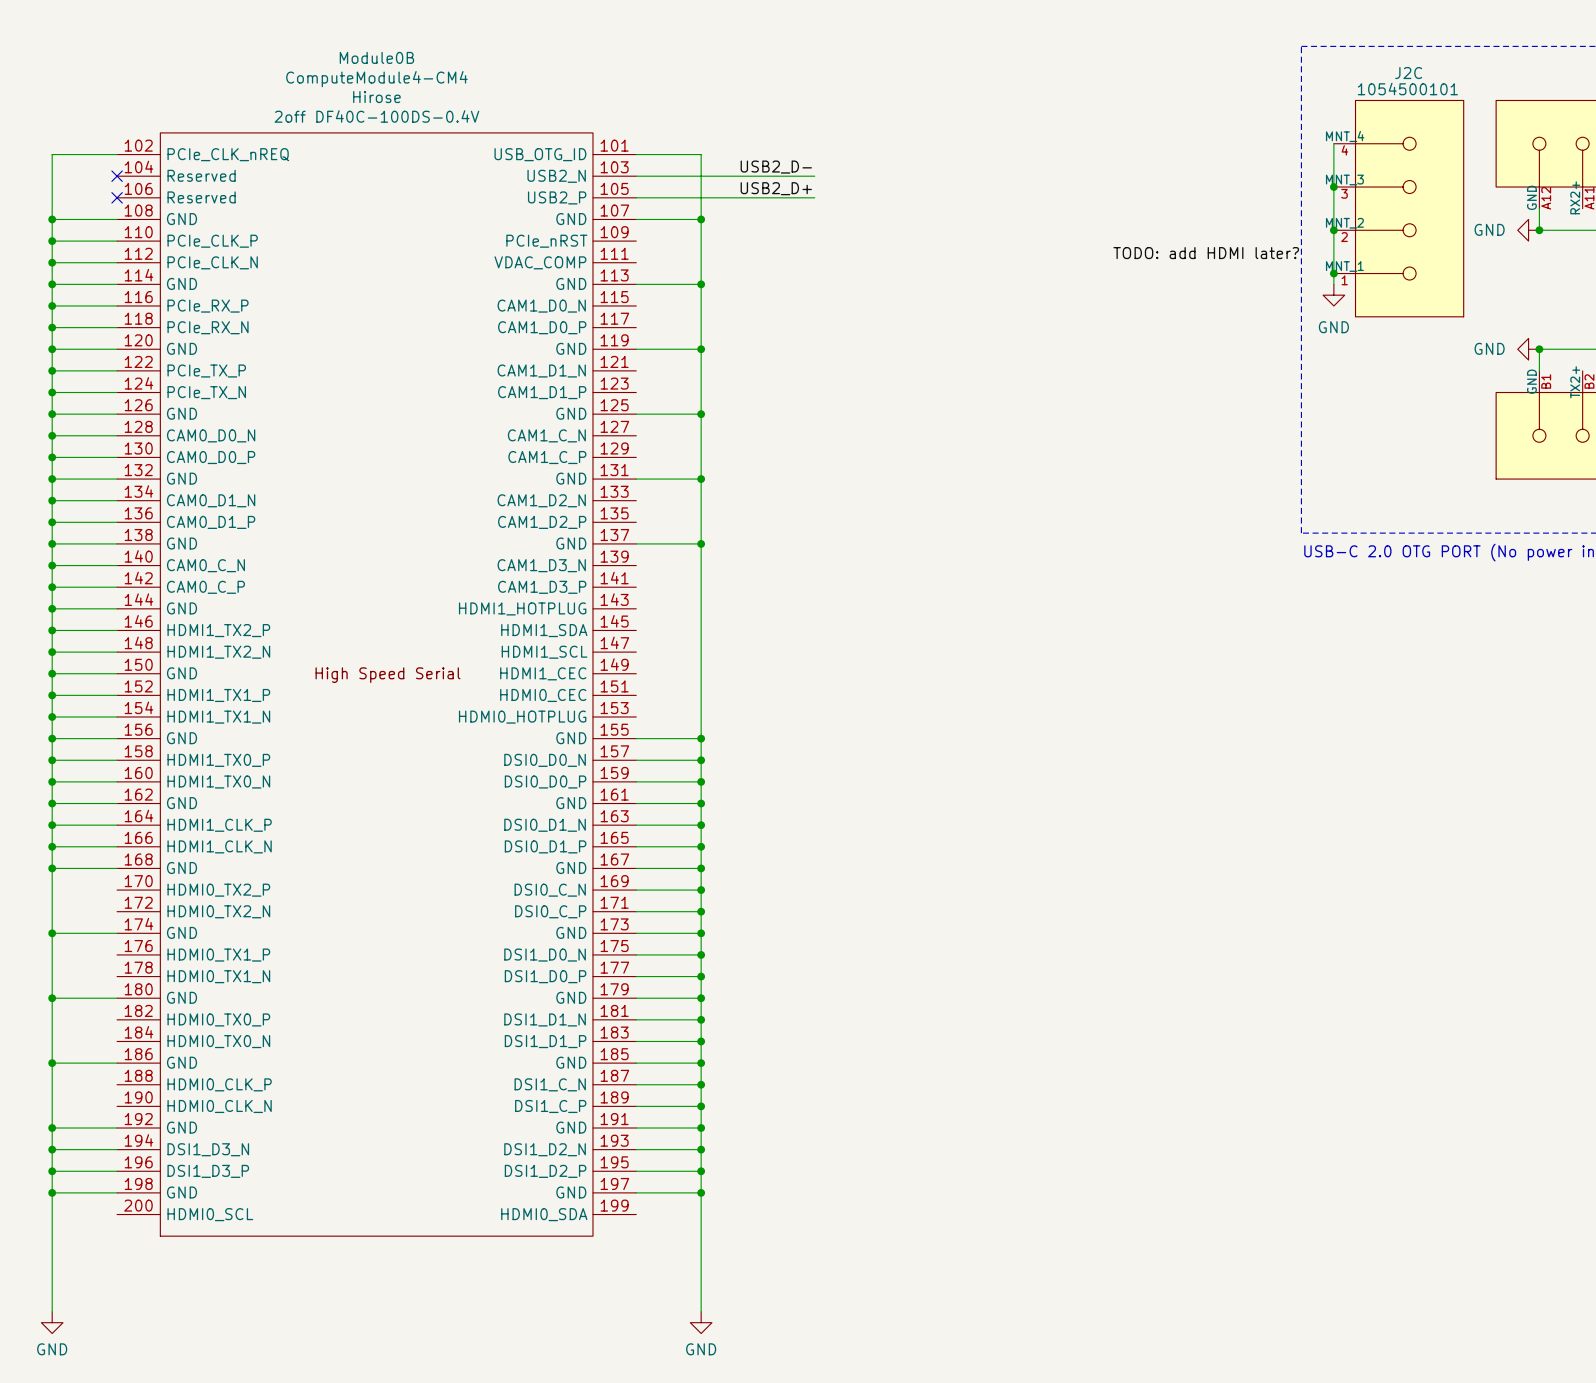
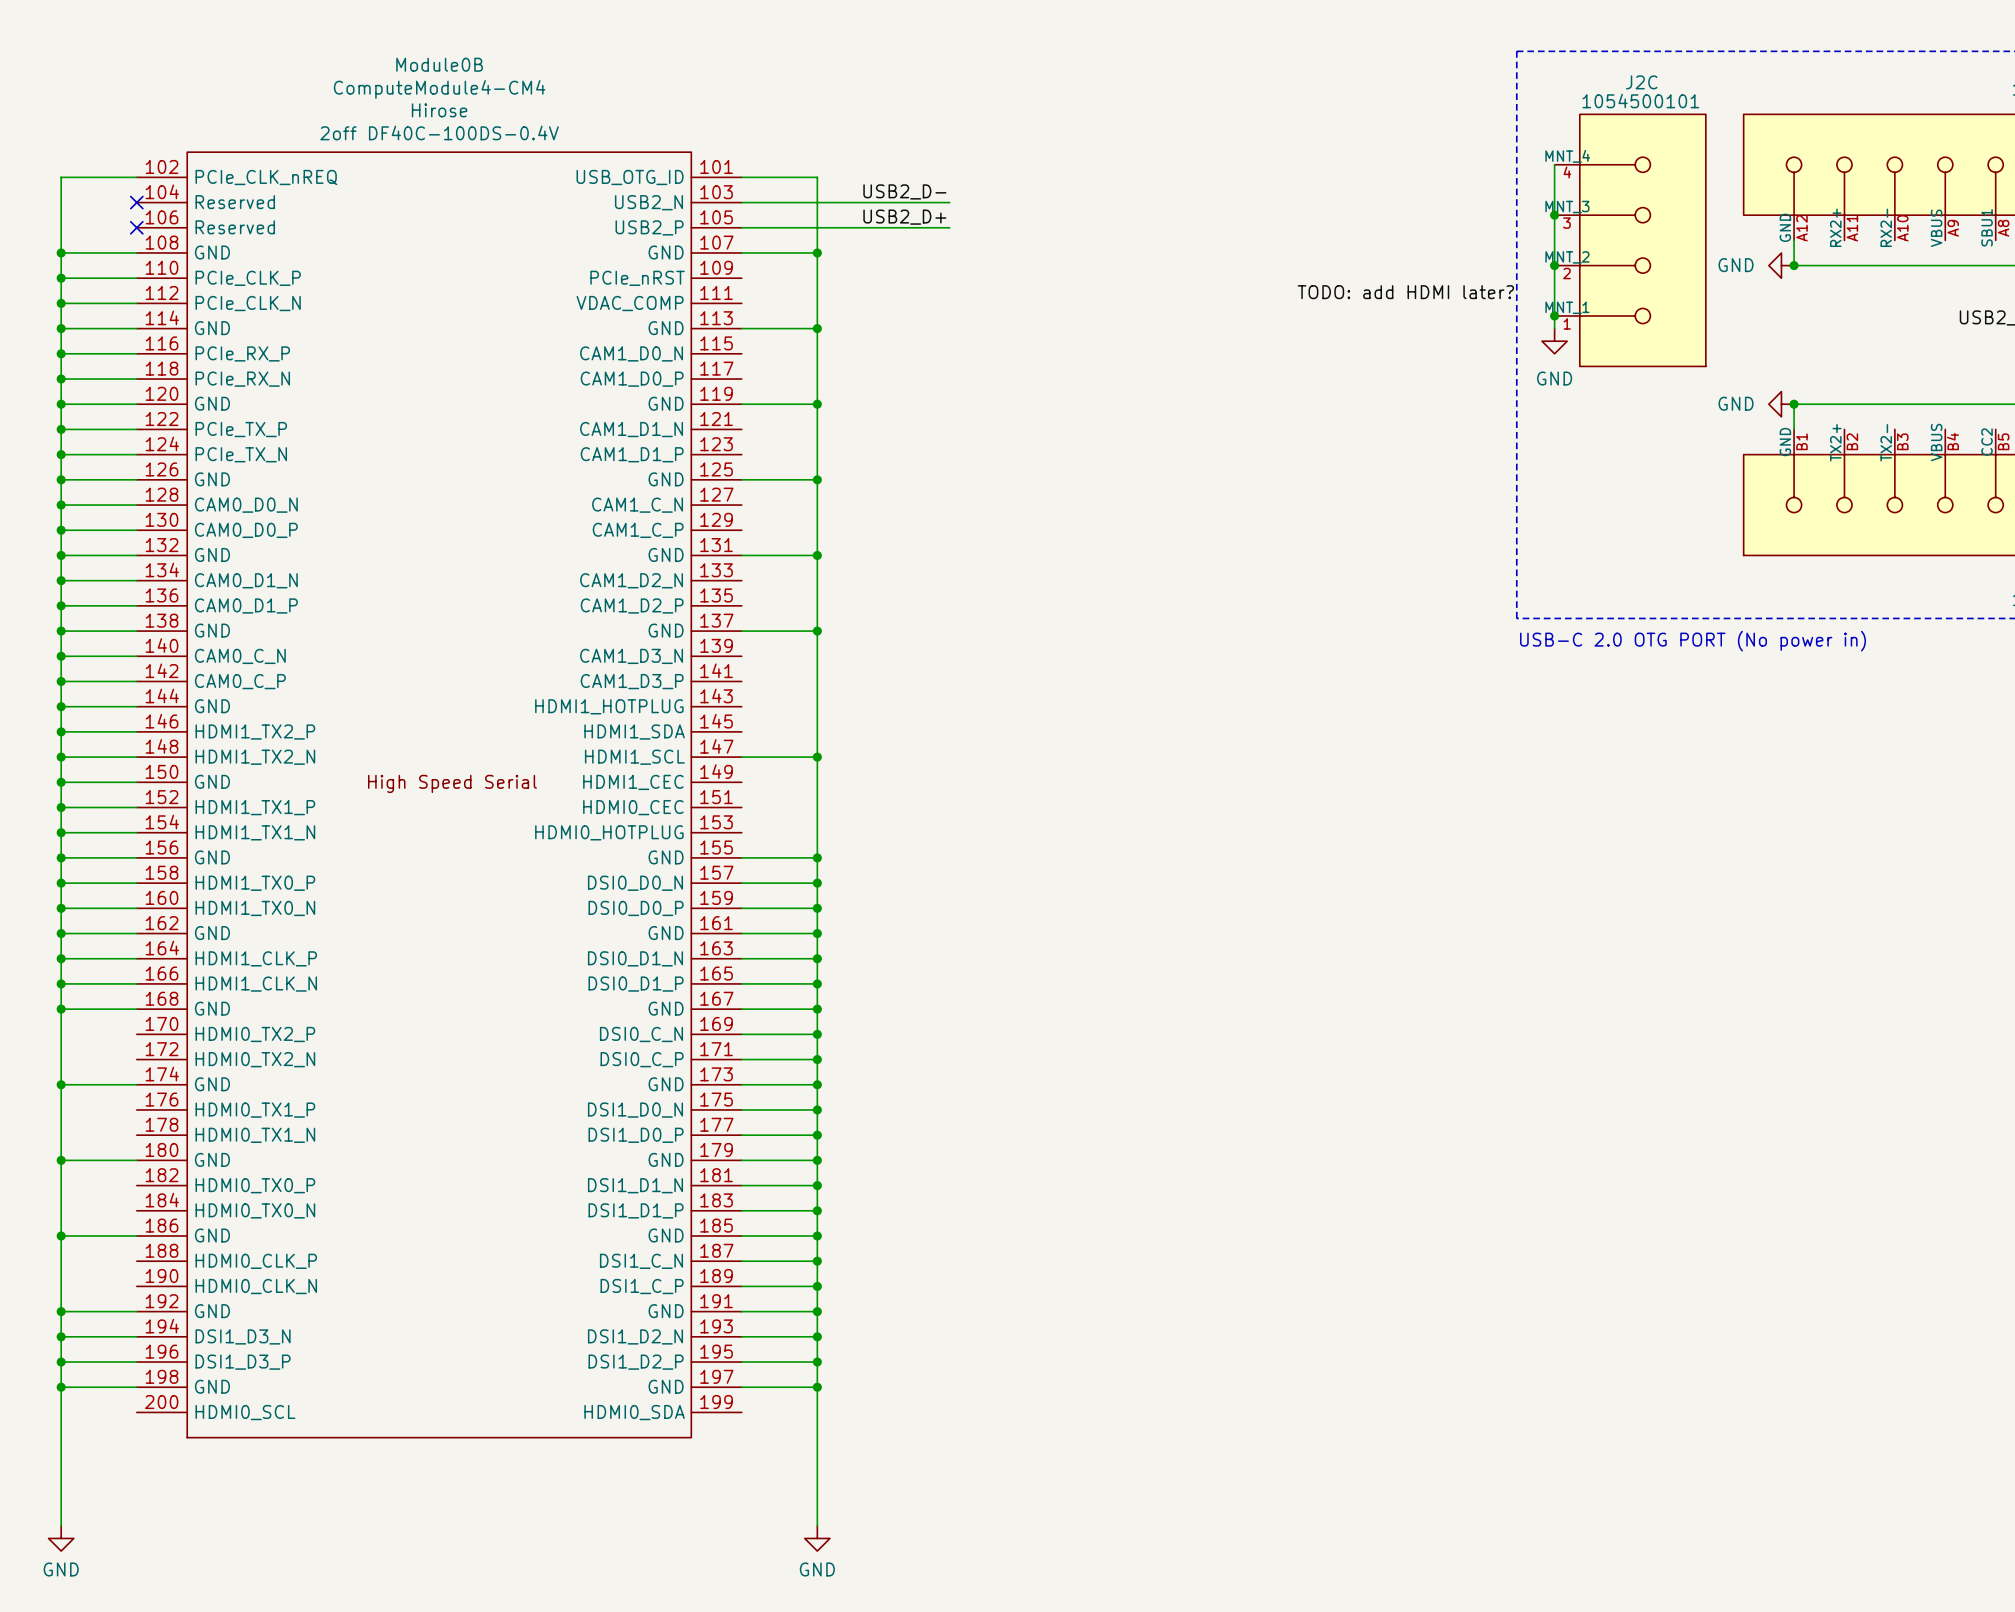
wire: none -> (741, 757) (817, 757)
junction: none -> (817, 757)

